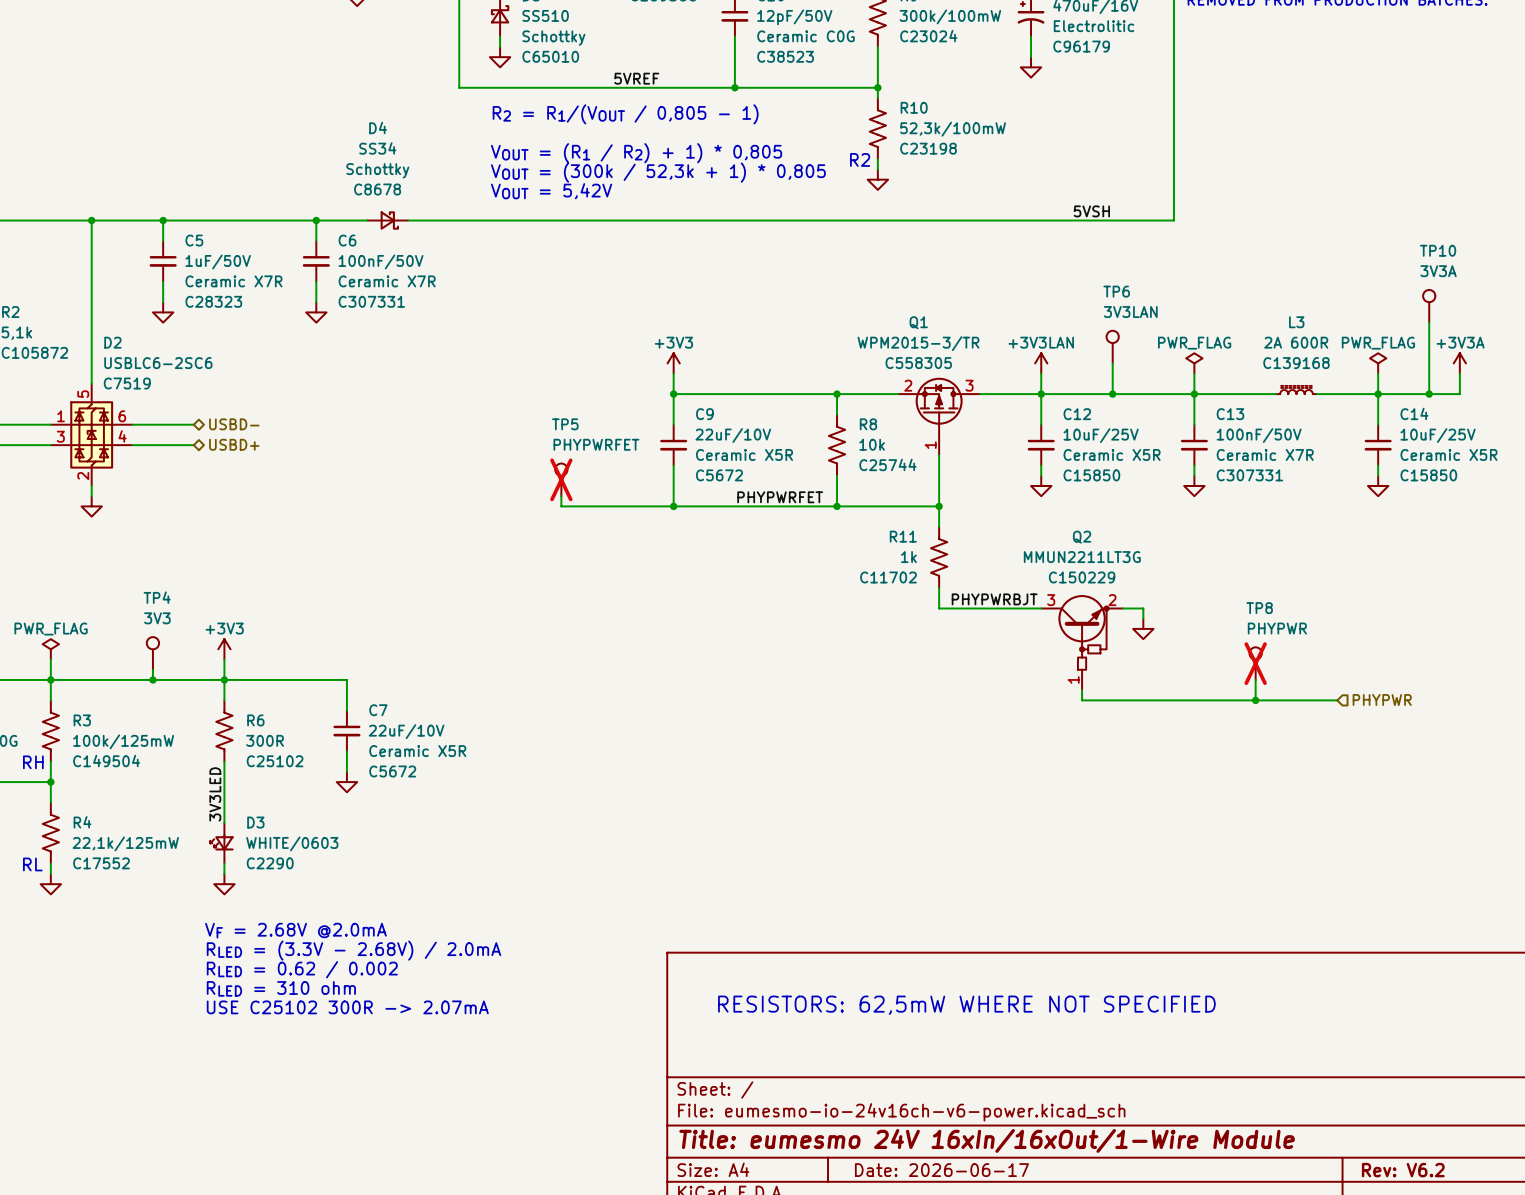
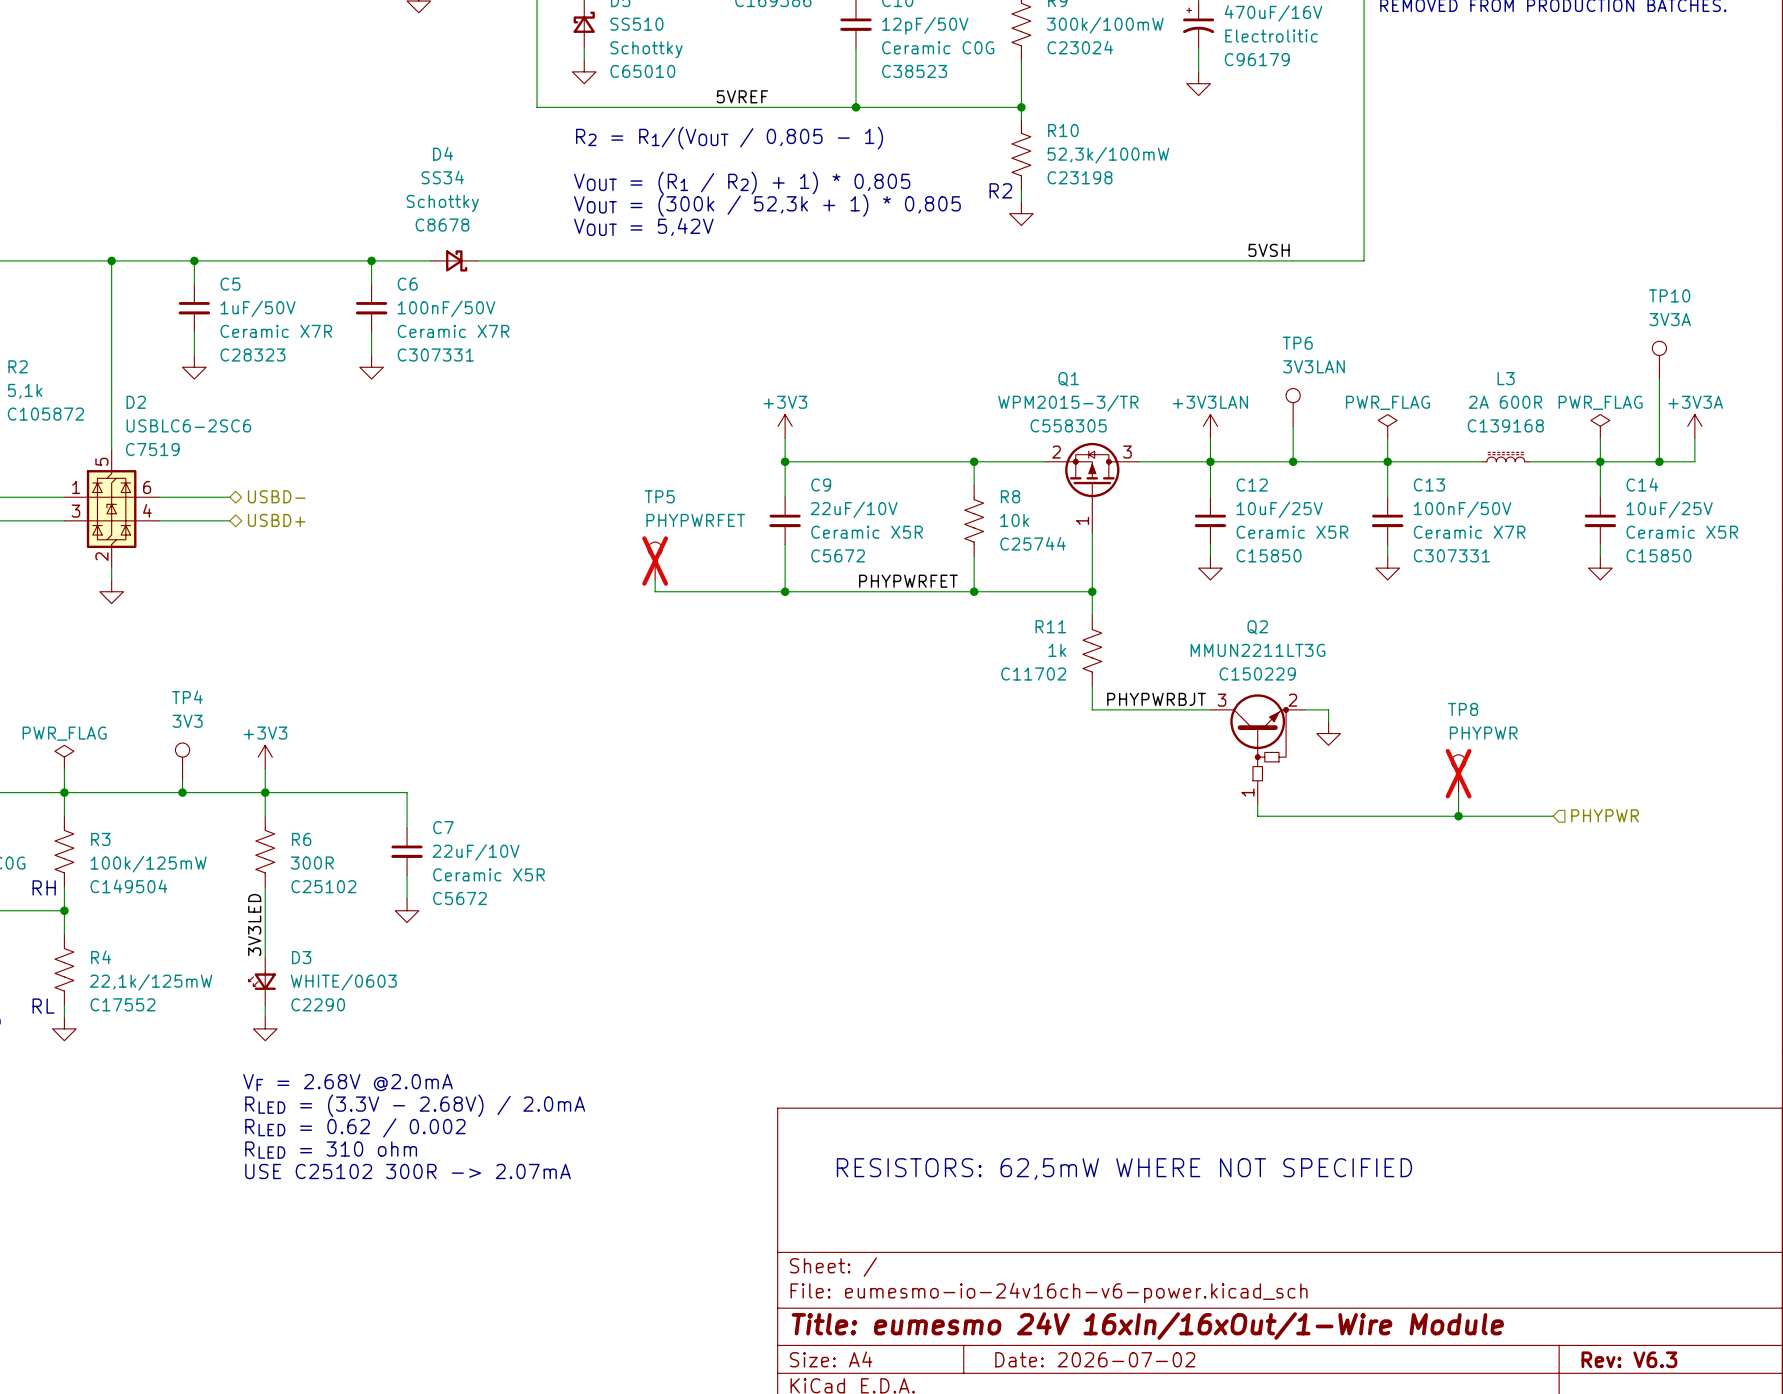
title block: Date: 2026-06-17 (941, 1170) -> Date: 2026-07-02 (1095, 1359)
title block: Rev: V6.2 (1403, 1170) -> Rev: V6.3 (1629, 1359)

